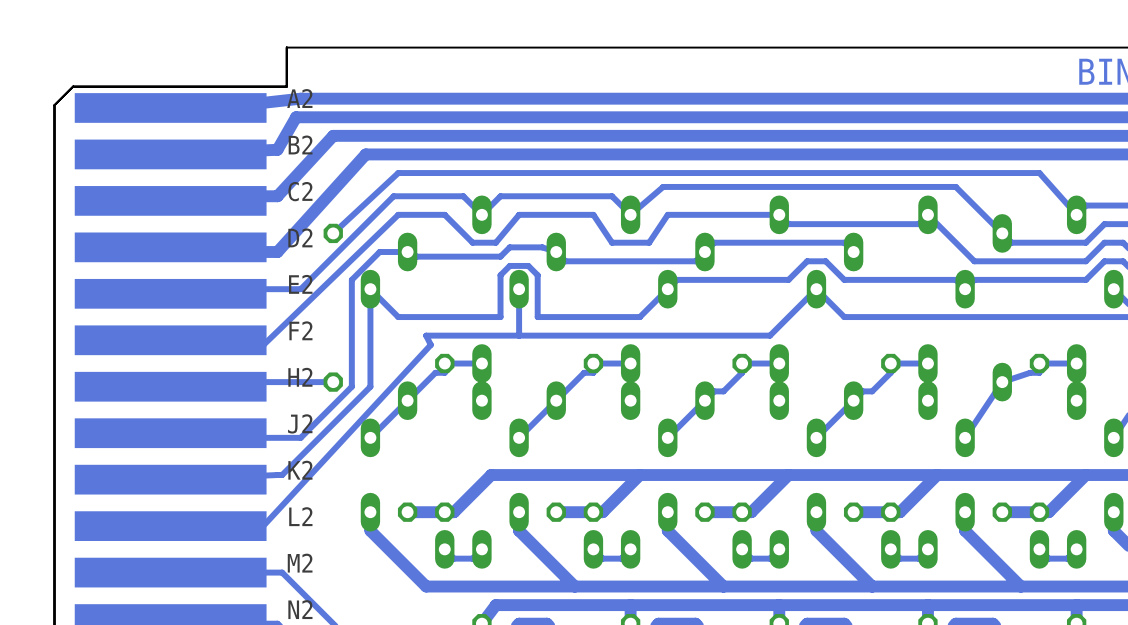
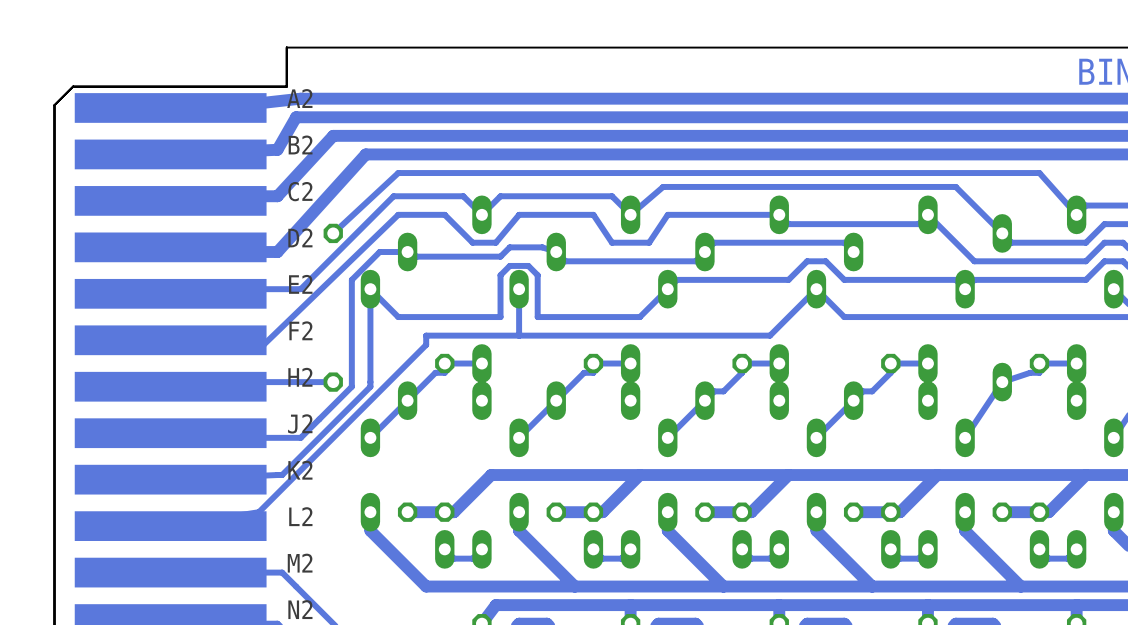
track: (426, 335) (430, 344) (258, 530) (170, 526) -> (426, 335) (426, 344) (258, 512) (170, 526)

